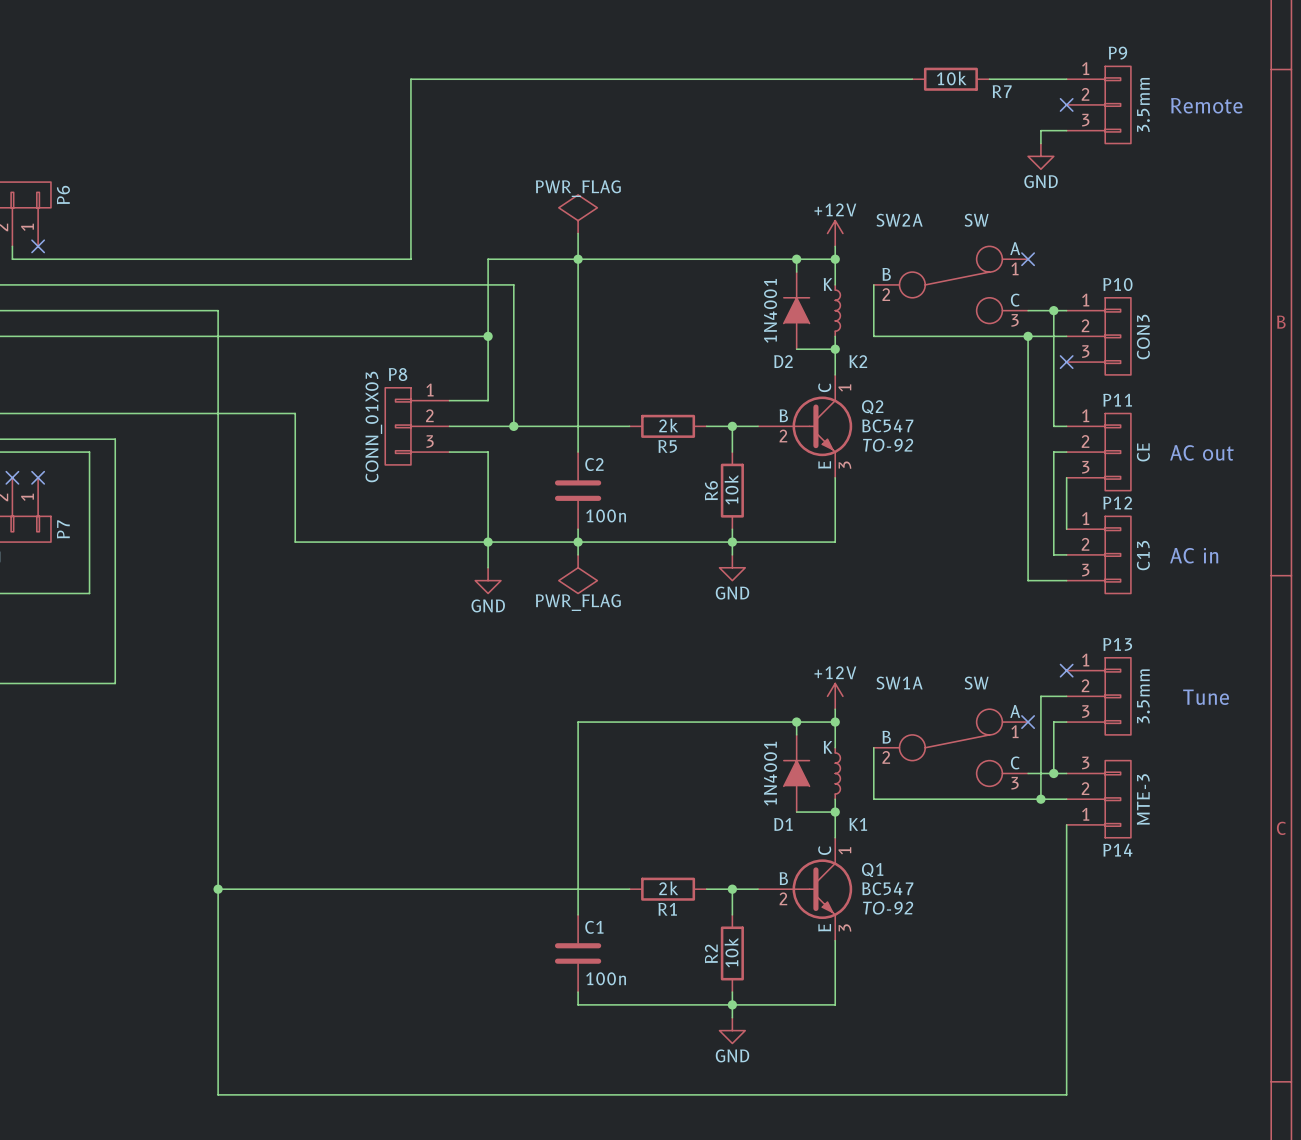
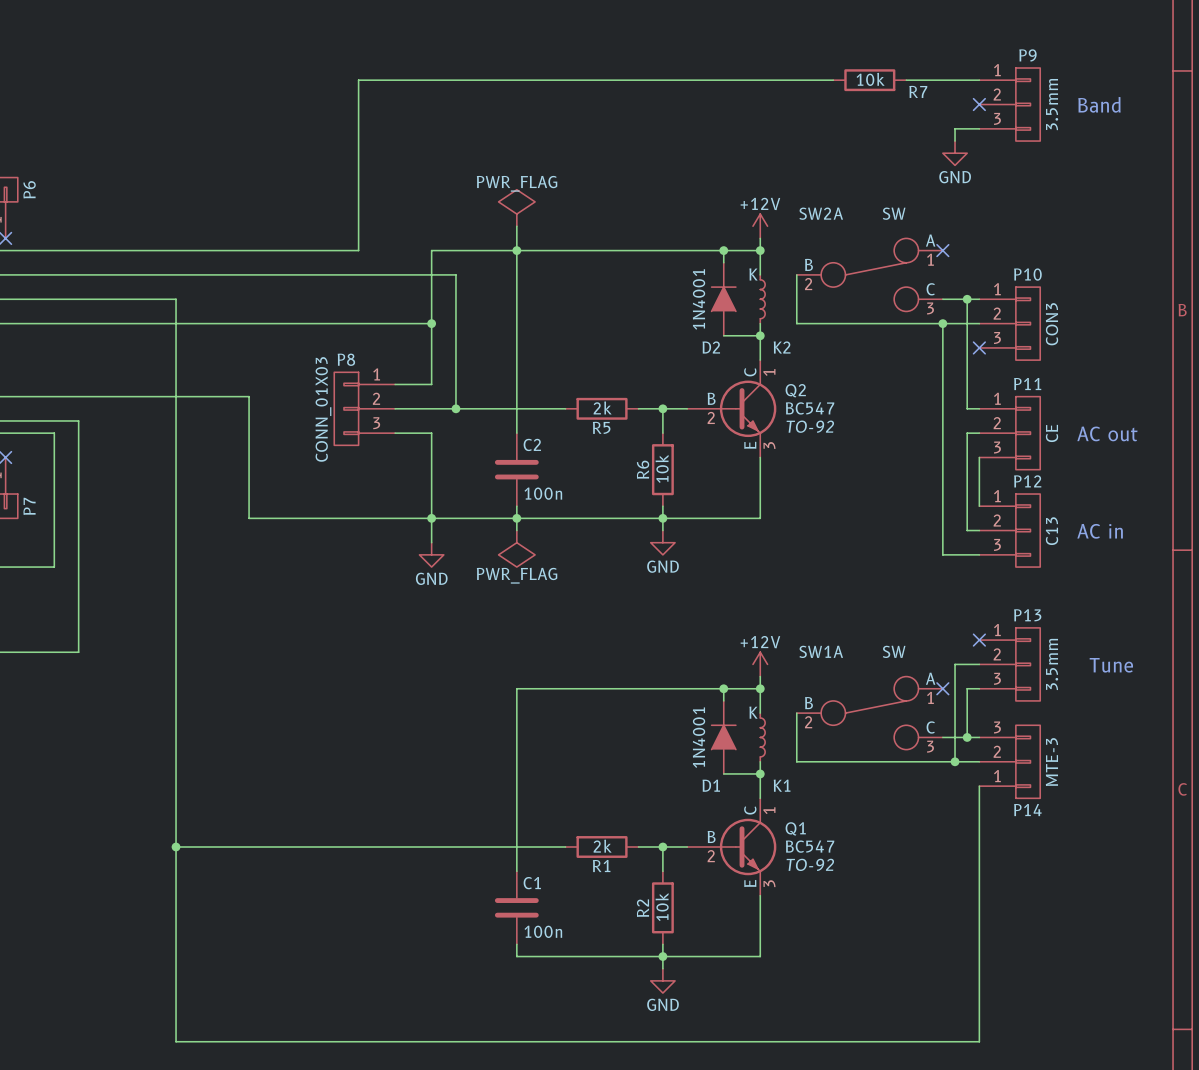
text: Remote (1206, 105) -> Band (1099, 104)

